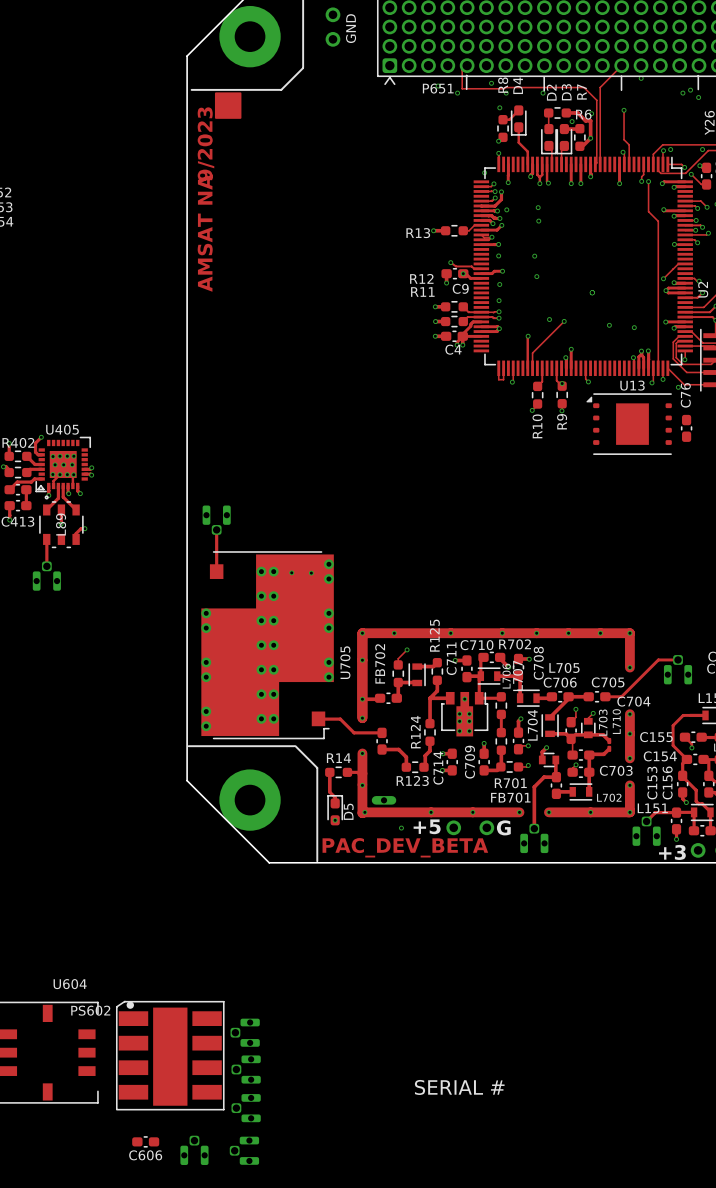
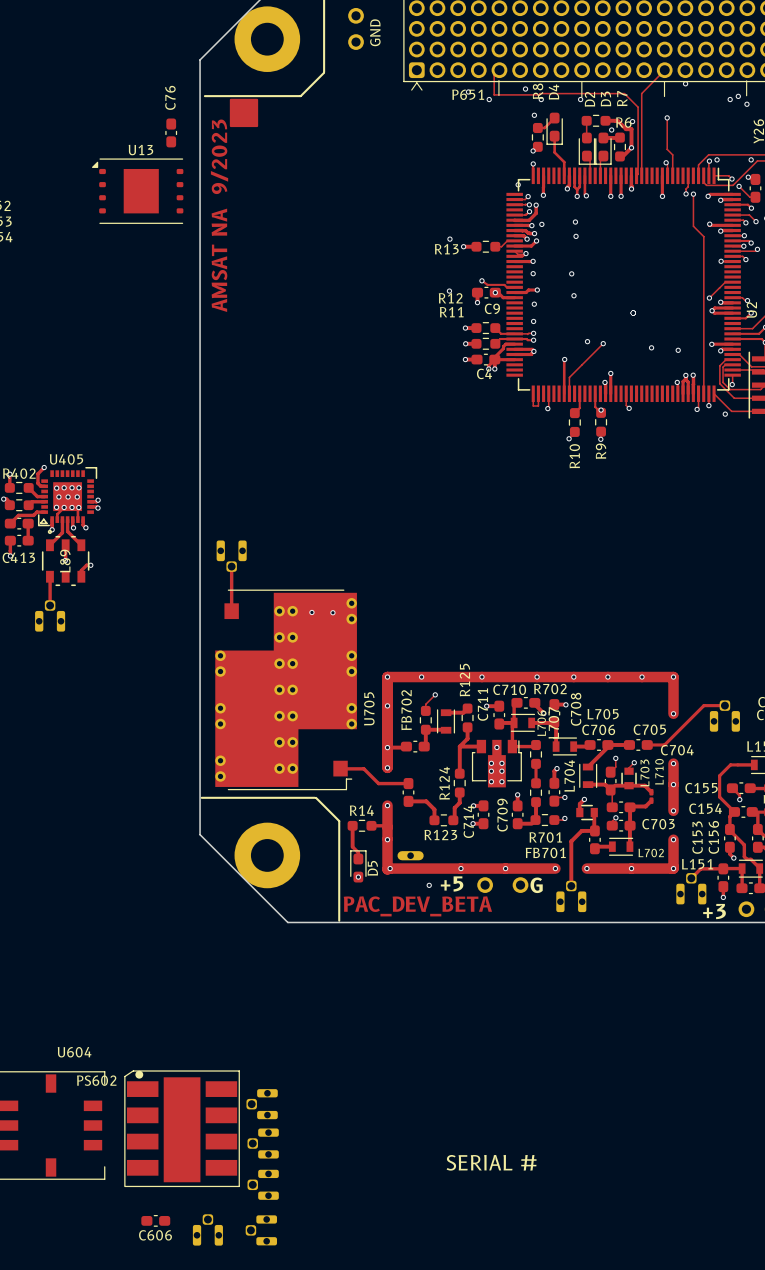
track: none -> (732, 204) (747, 204) (751, 208)
via: none -> (751, 208)
via: none -> (449, 239)
via: none -> (449, 291)
U13 position: (629, 424) -> (137, 191)
C76 position: (686, 428) -> (171, 132)

